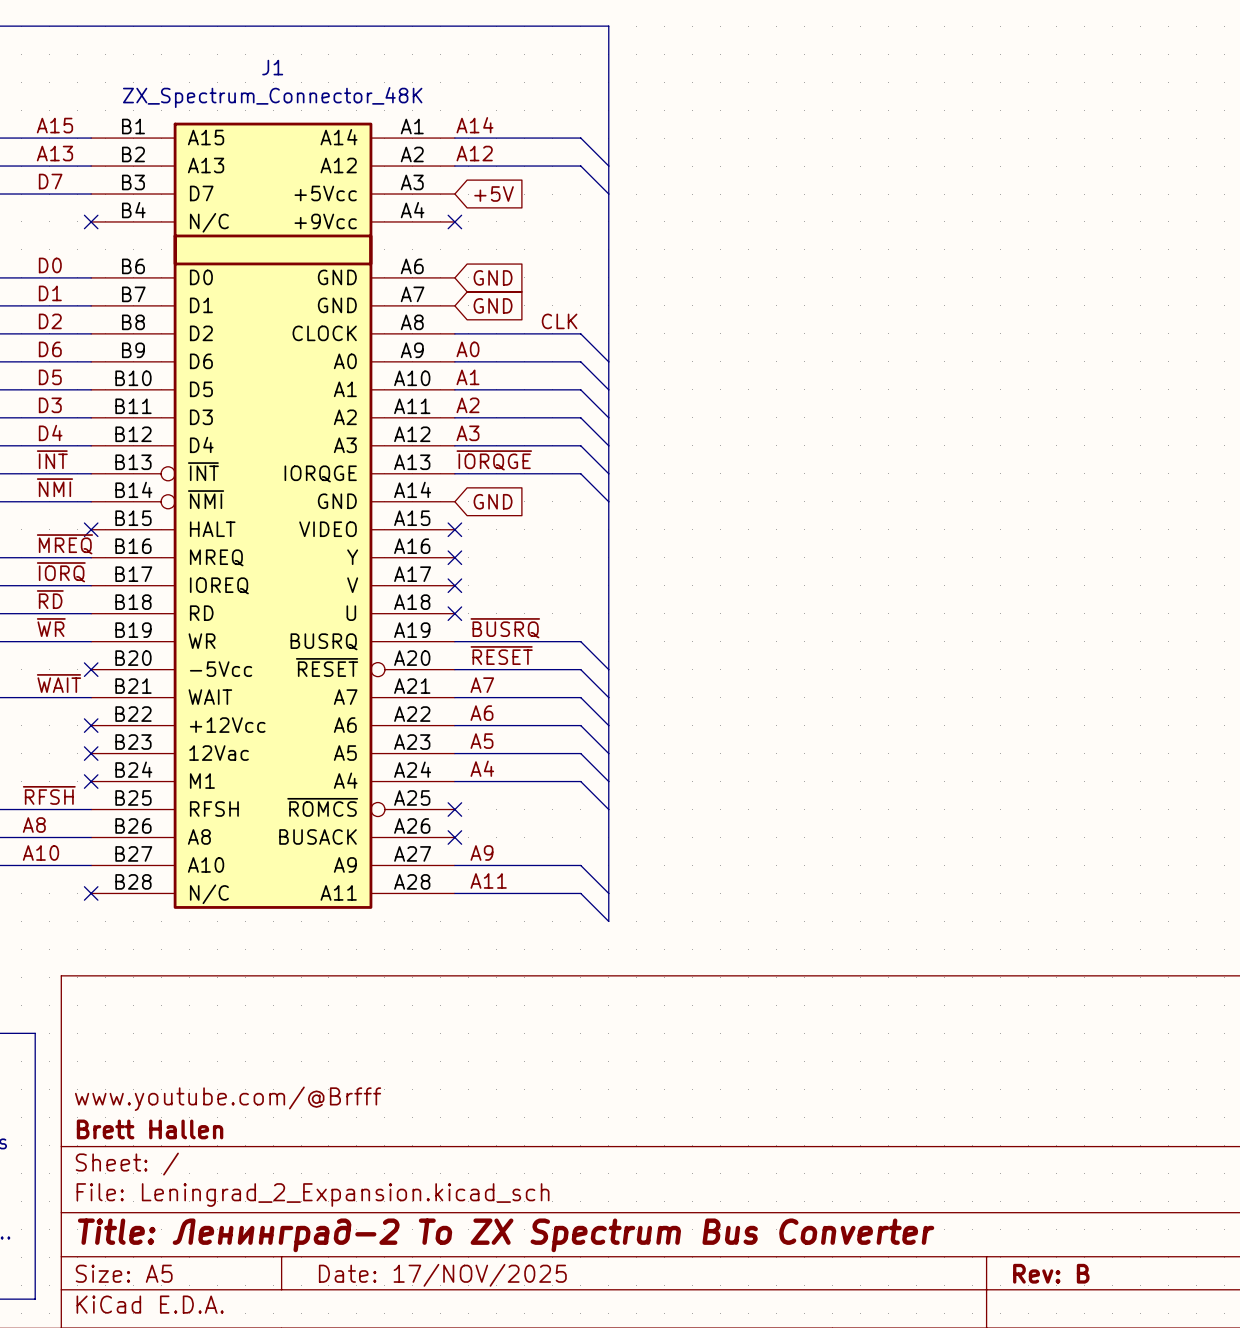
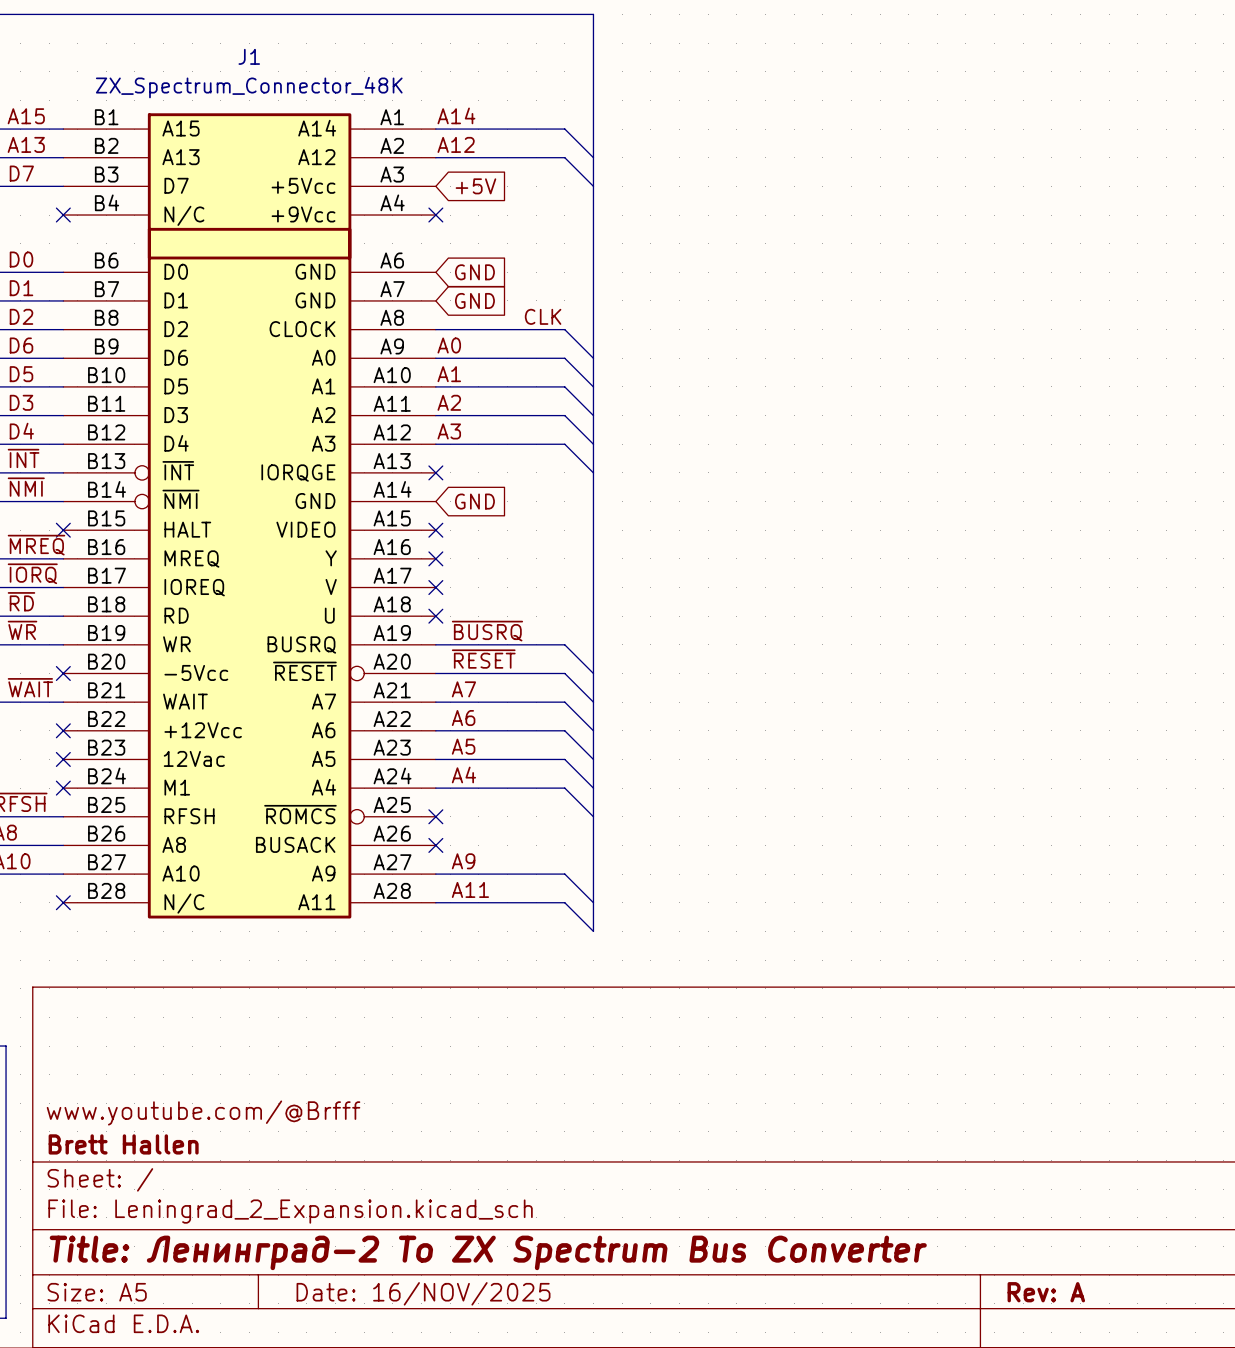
label: ~{IORQGE} (494, 460) -> none
wire: (454, 473) (580, 473) (608, 501) -> none
no-connect mark: none -> (435, 472)
title block: Rev: B (1051, 1273) -> Rev: A (1046, 1292)
title block: Date: 17/NOV/2025 (442, 1275) -> Date: 16/NOV/2025 (423, 1293)

